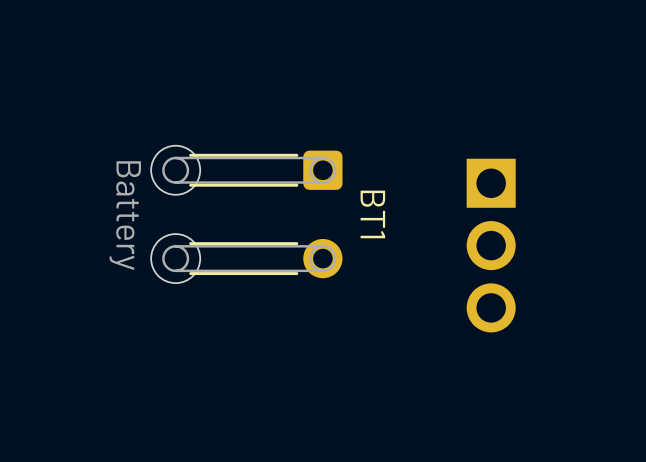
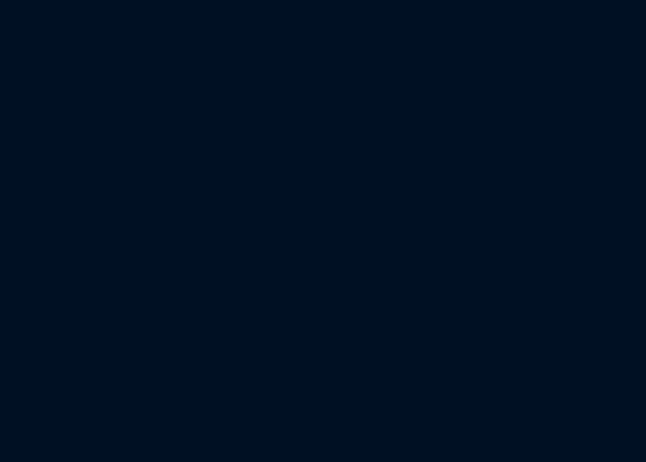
BT1: Battery (246, 214) -> none
part: (491, 245) -> none

